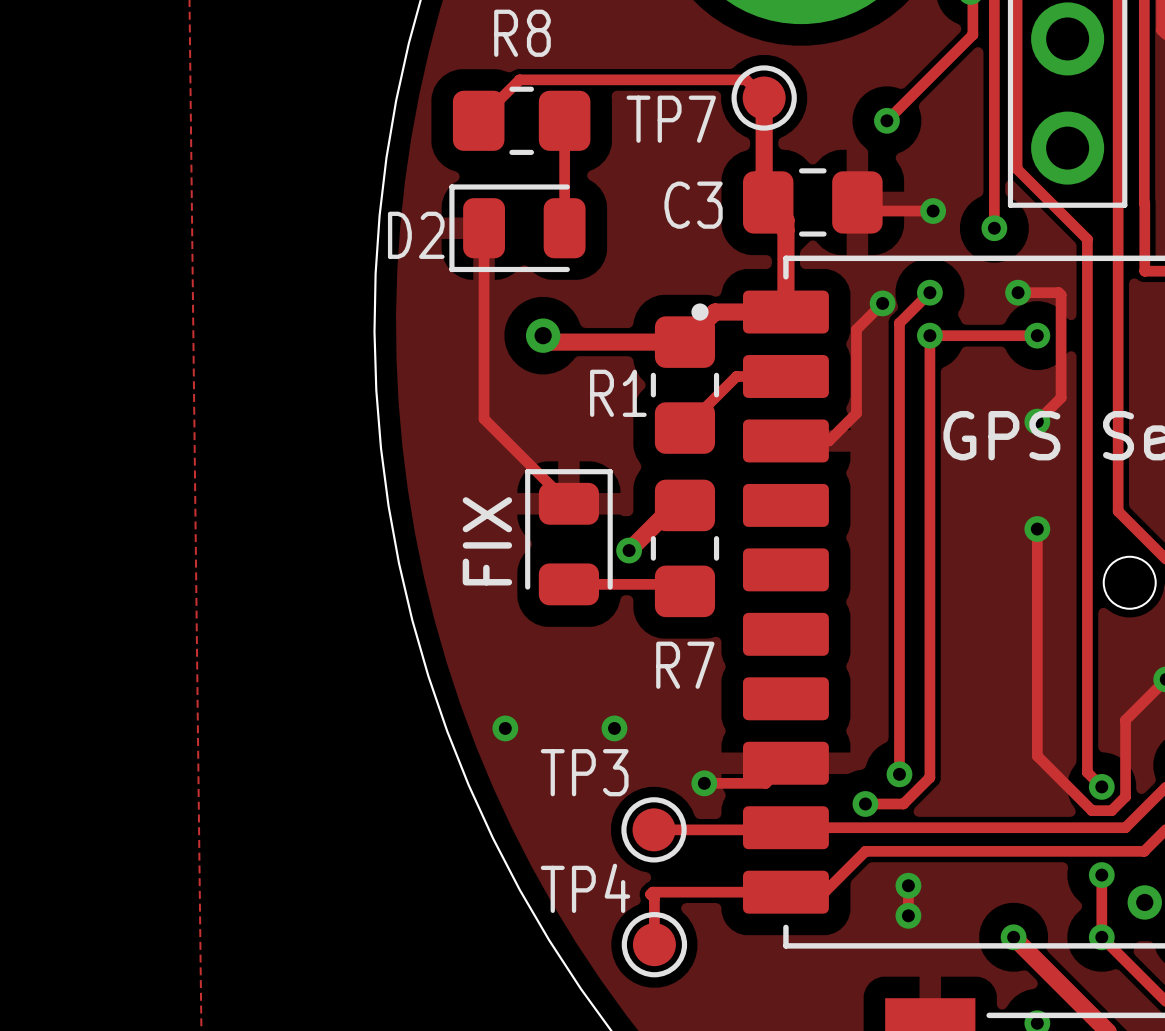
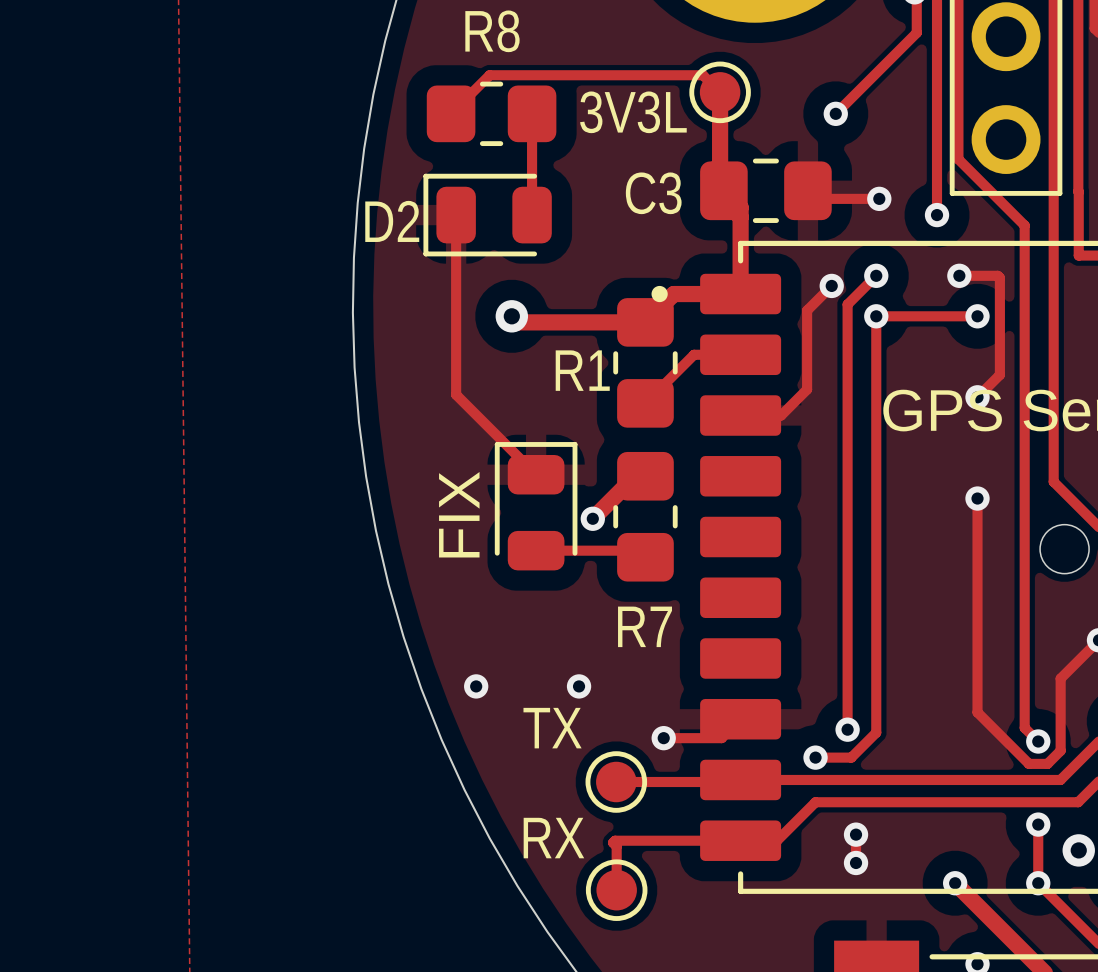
TP7 name: TP7 (671, 119) -> 3V3L (633, 112)
TP3 name: TP3 (584, 772) -> TX (552, 728)
TP4 name: TP4 (585, 888) -> RX (553, 838)

